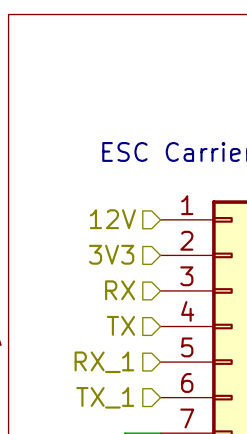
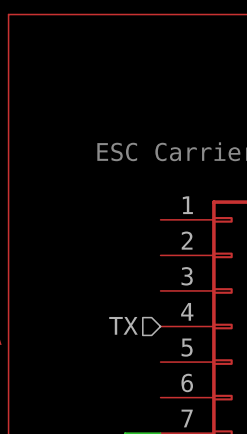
hierarchical label: 12V (112, 219) -> none
hierarchical label: 3V3 (111, 254) -> none
hierarchical label: RX (120, 290) -> none
hierarchical label: RX_1 (104, 362) -> none
hierarchical label: TX_1 (105, 397) -> none

